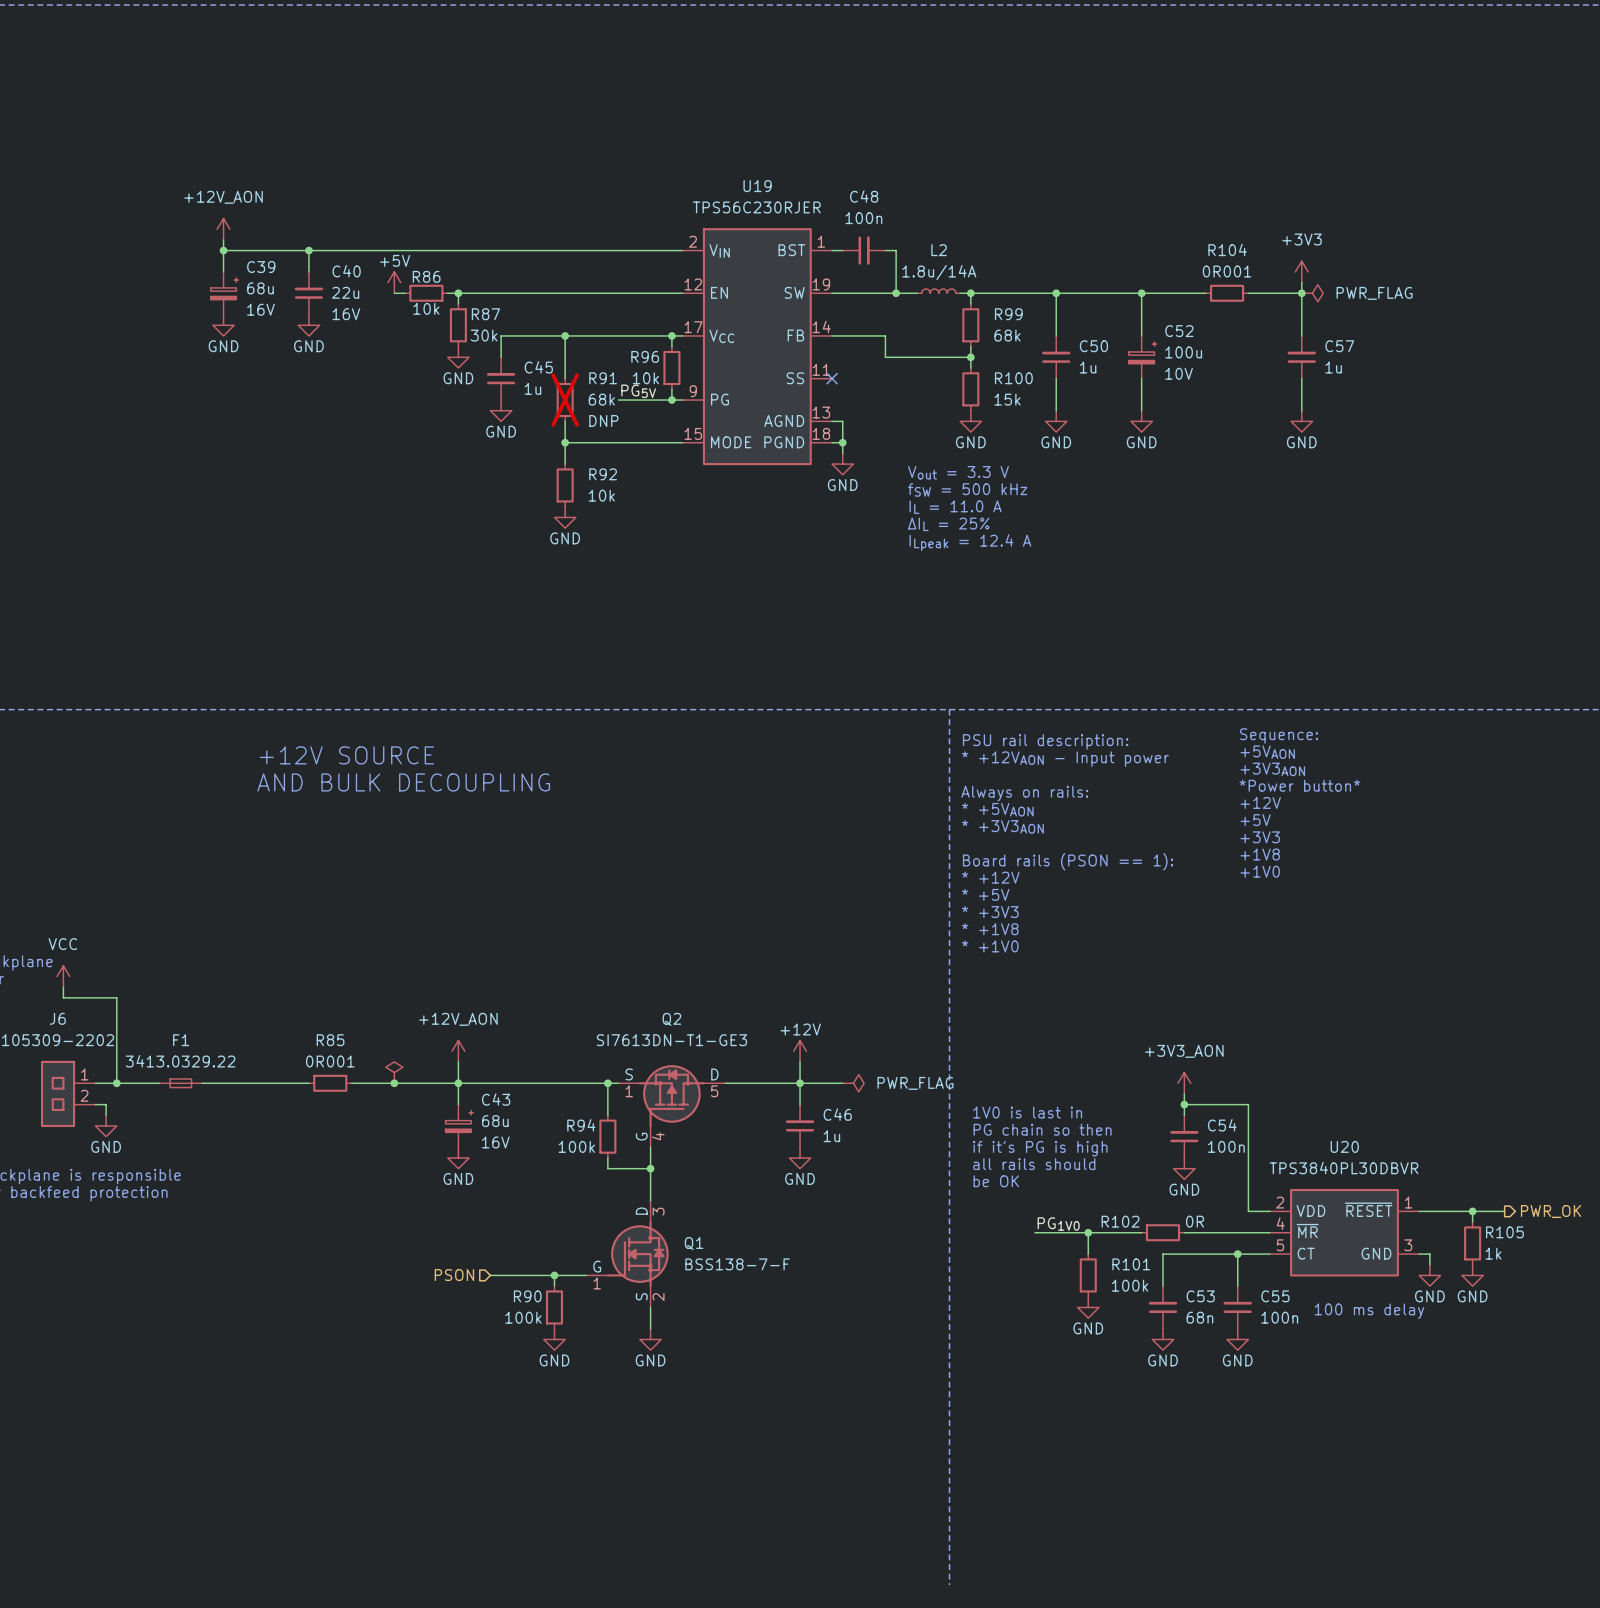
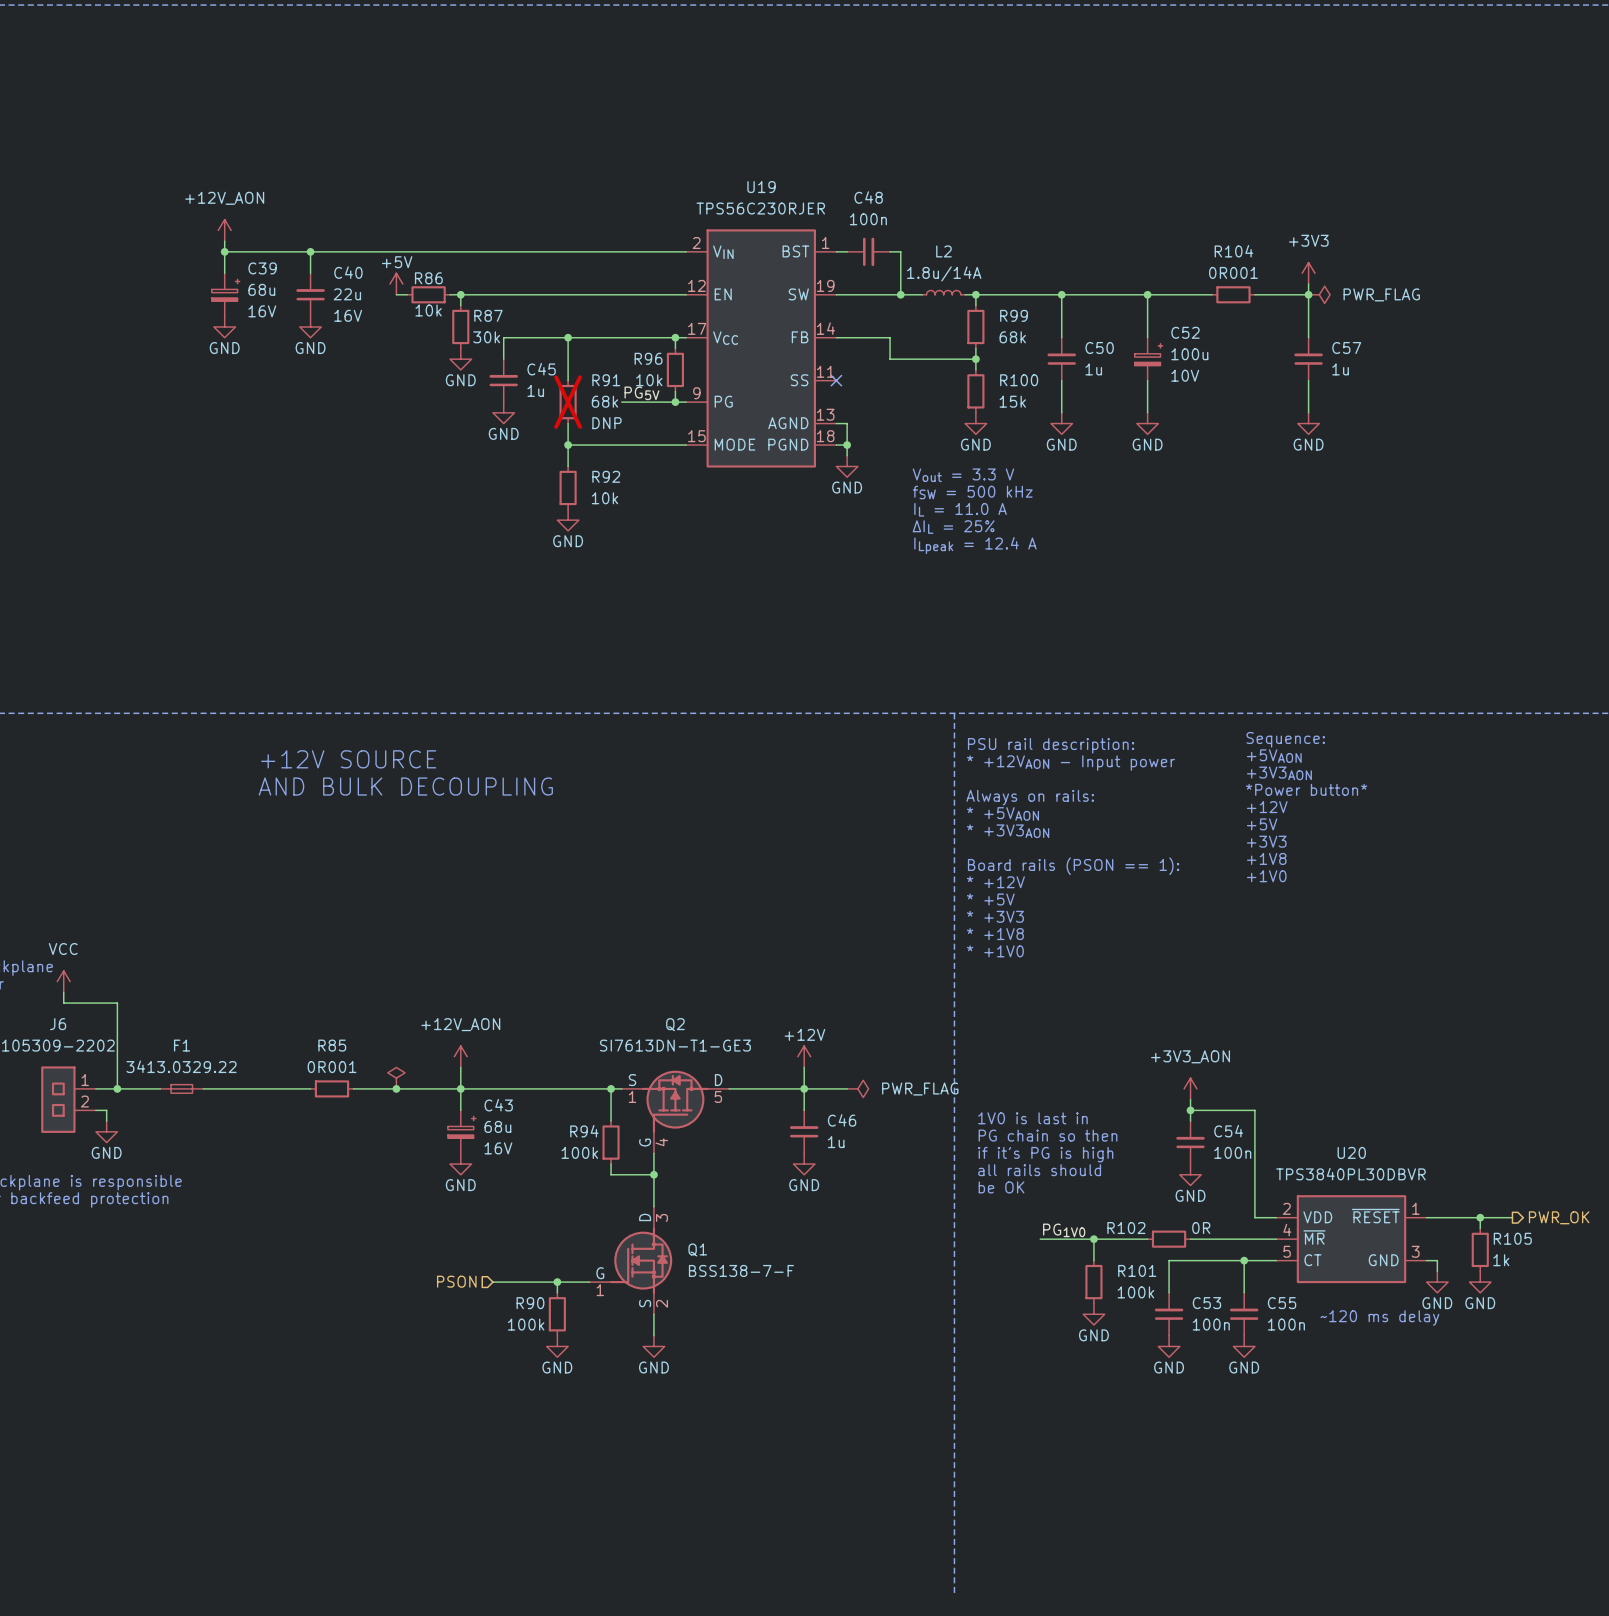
text: 100 ms delay (1369, 1311) -> ~120 ms delay (1379, 1318)
C53 text: 68n (1199, 1317) -> 100n (1211, 1324)

